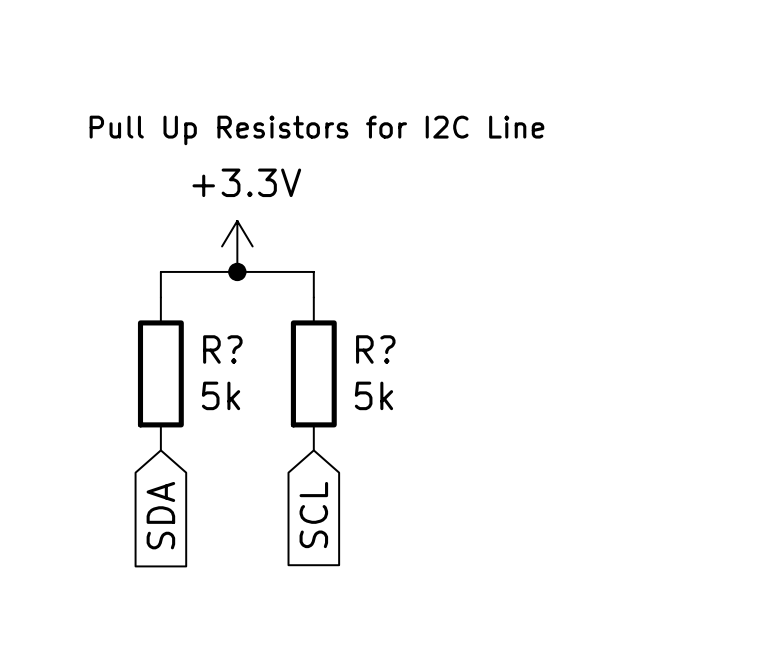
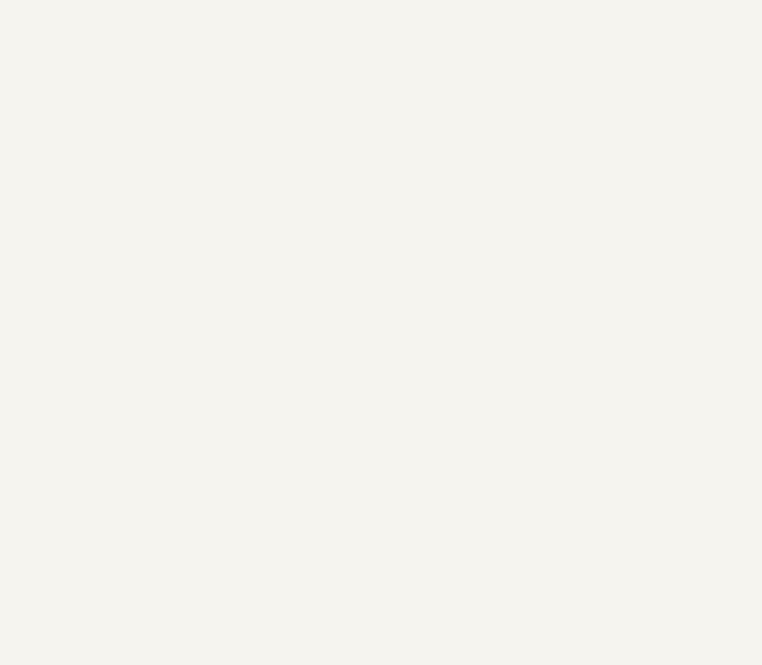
text: Pull Up Resistors for I2C Line (316, 130) -> none
power symbol: +3.3V (237, 246) -> none
junction: (237, 271) -> none
wire: (160, 297) (160, 271) (313, 271) (313, 297) -> none
R?: 5k (160, 373) -> none
R?: 5k (313, 373) -> none
global label: SDA (160, 515) -> none
global label: SCL (313, 515) -> none

